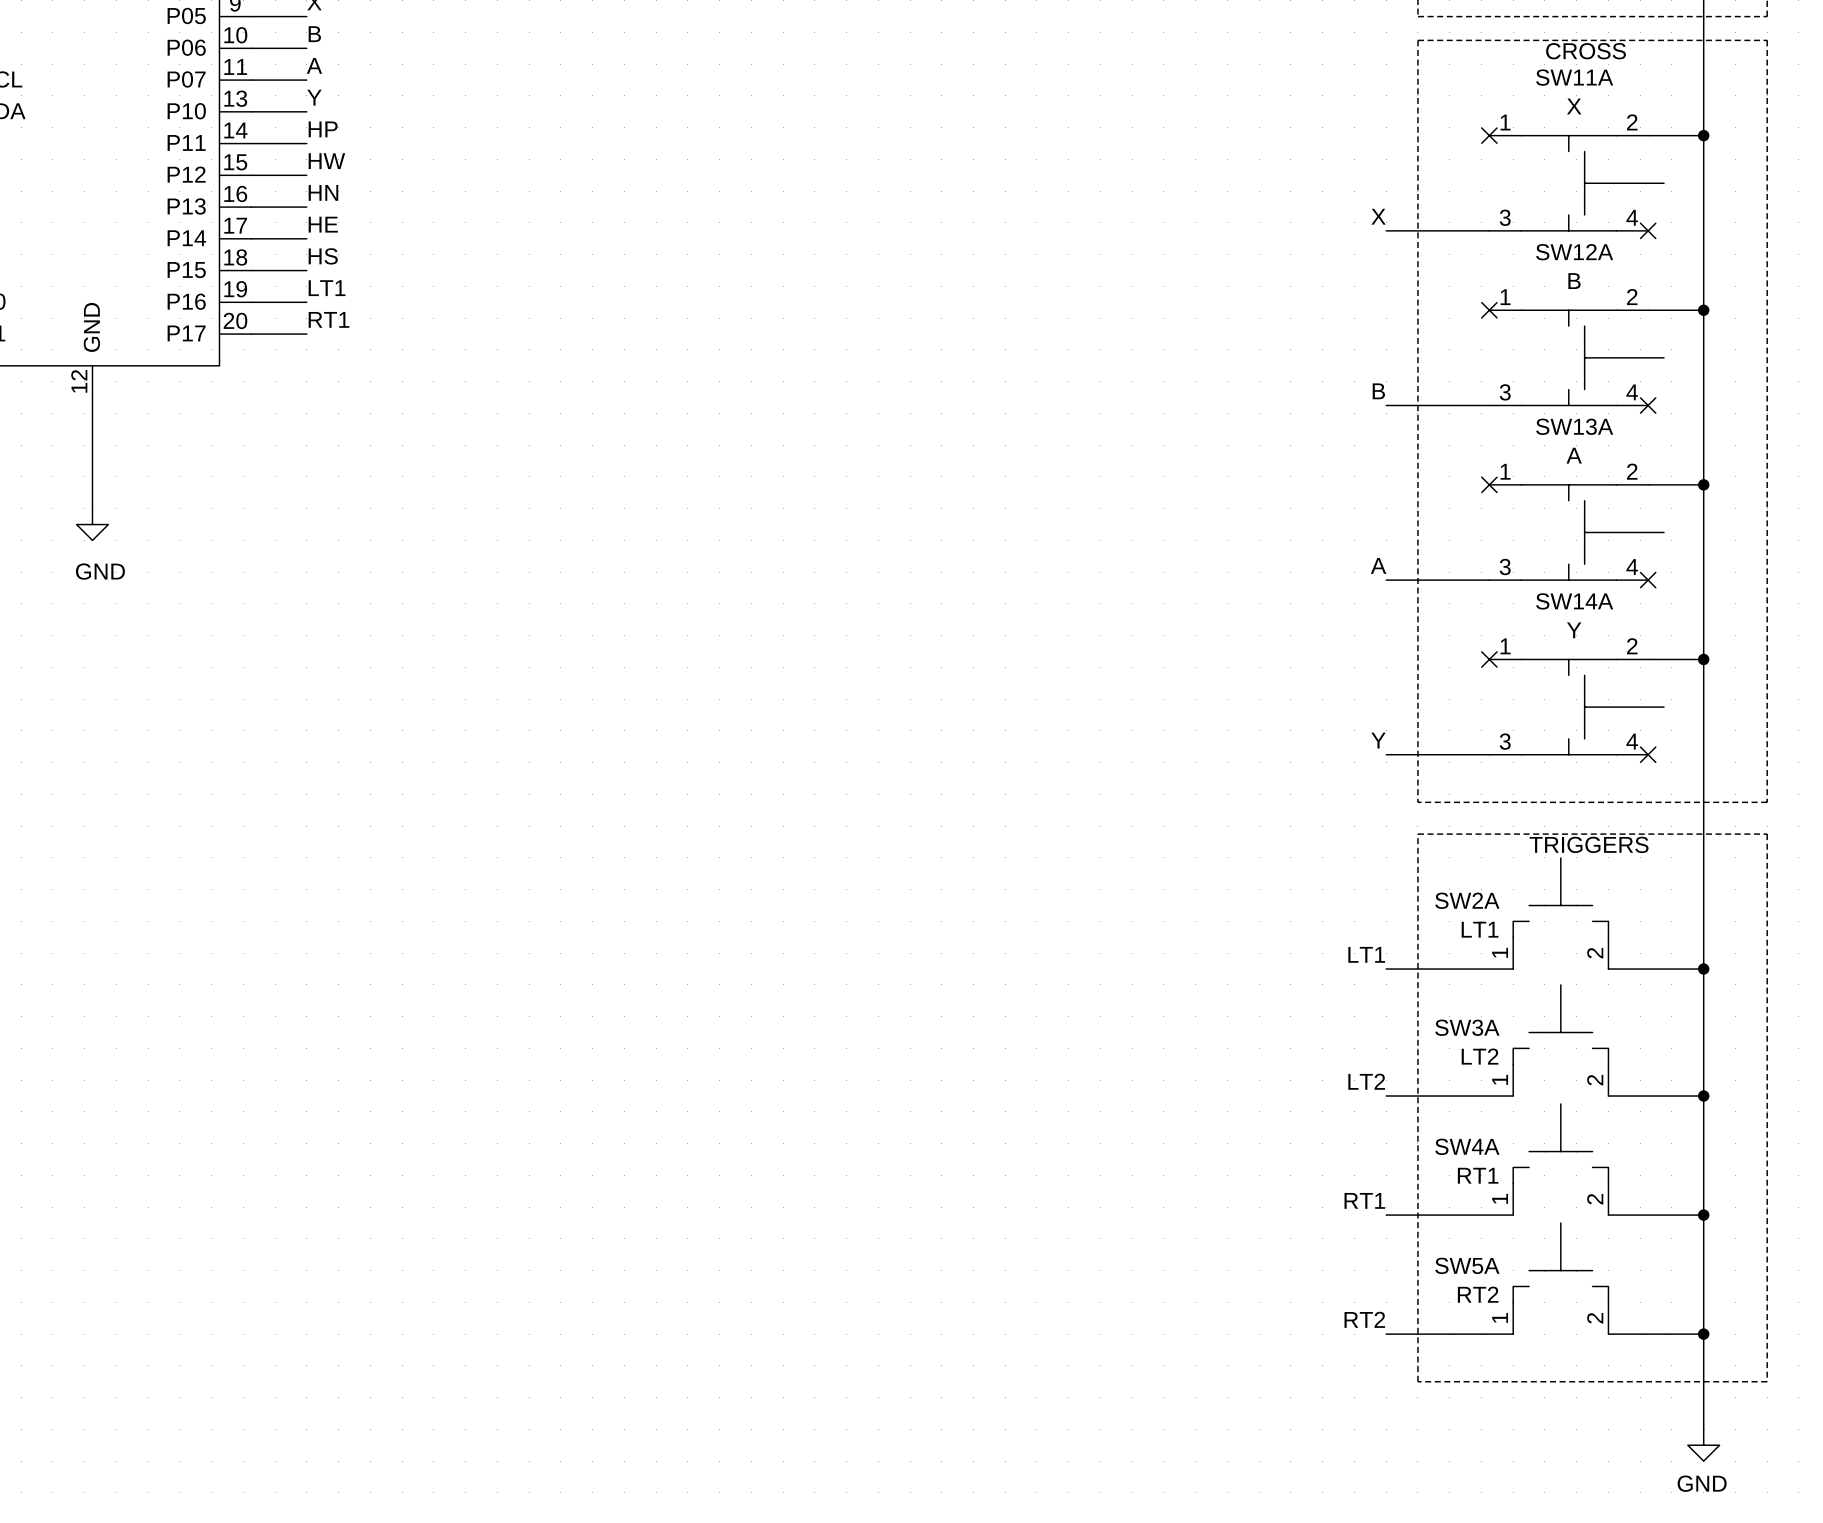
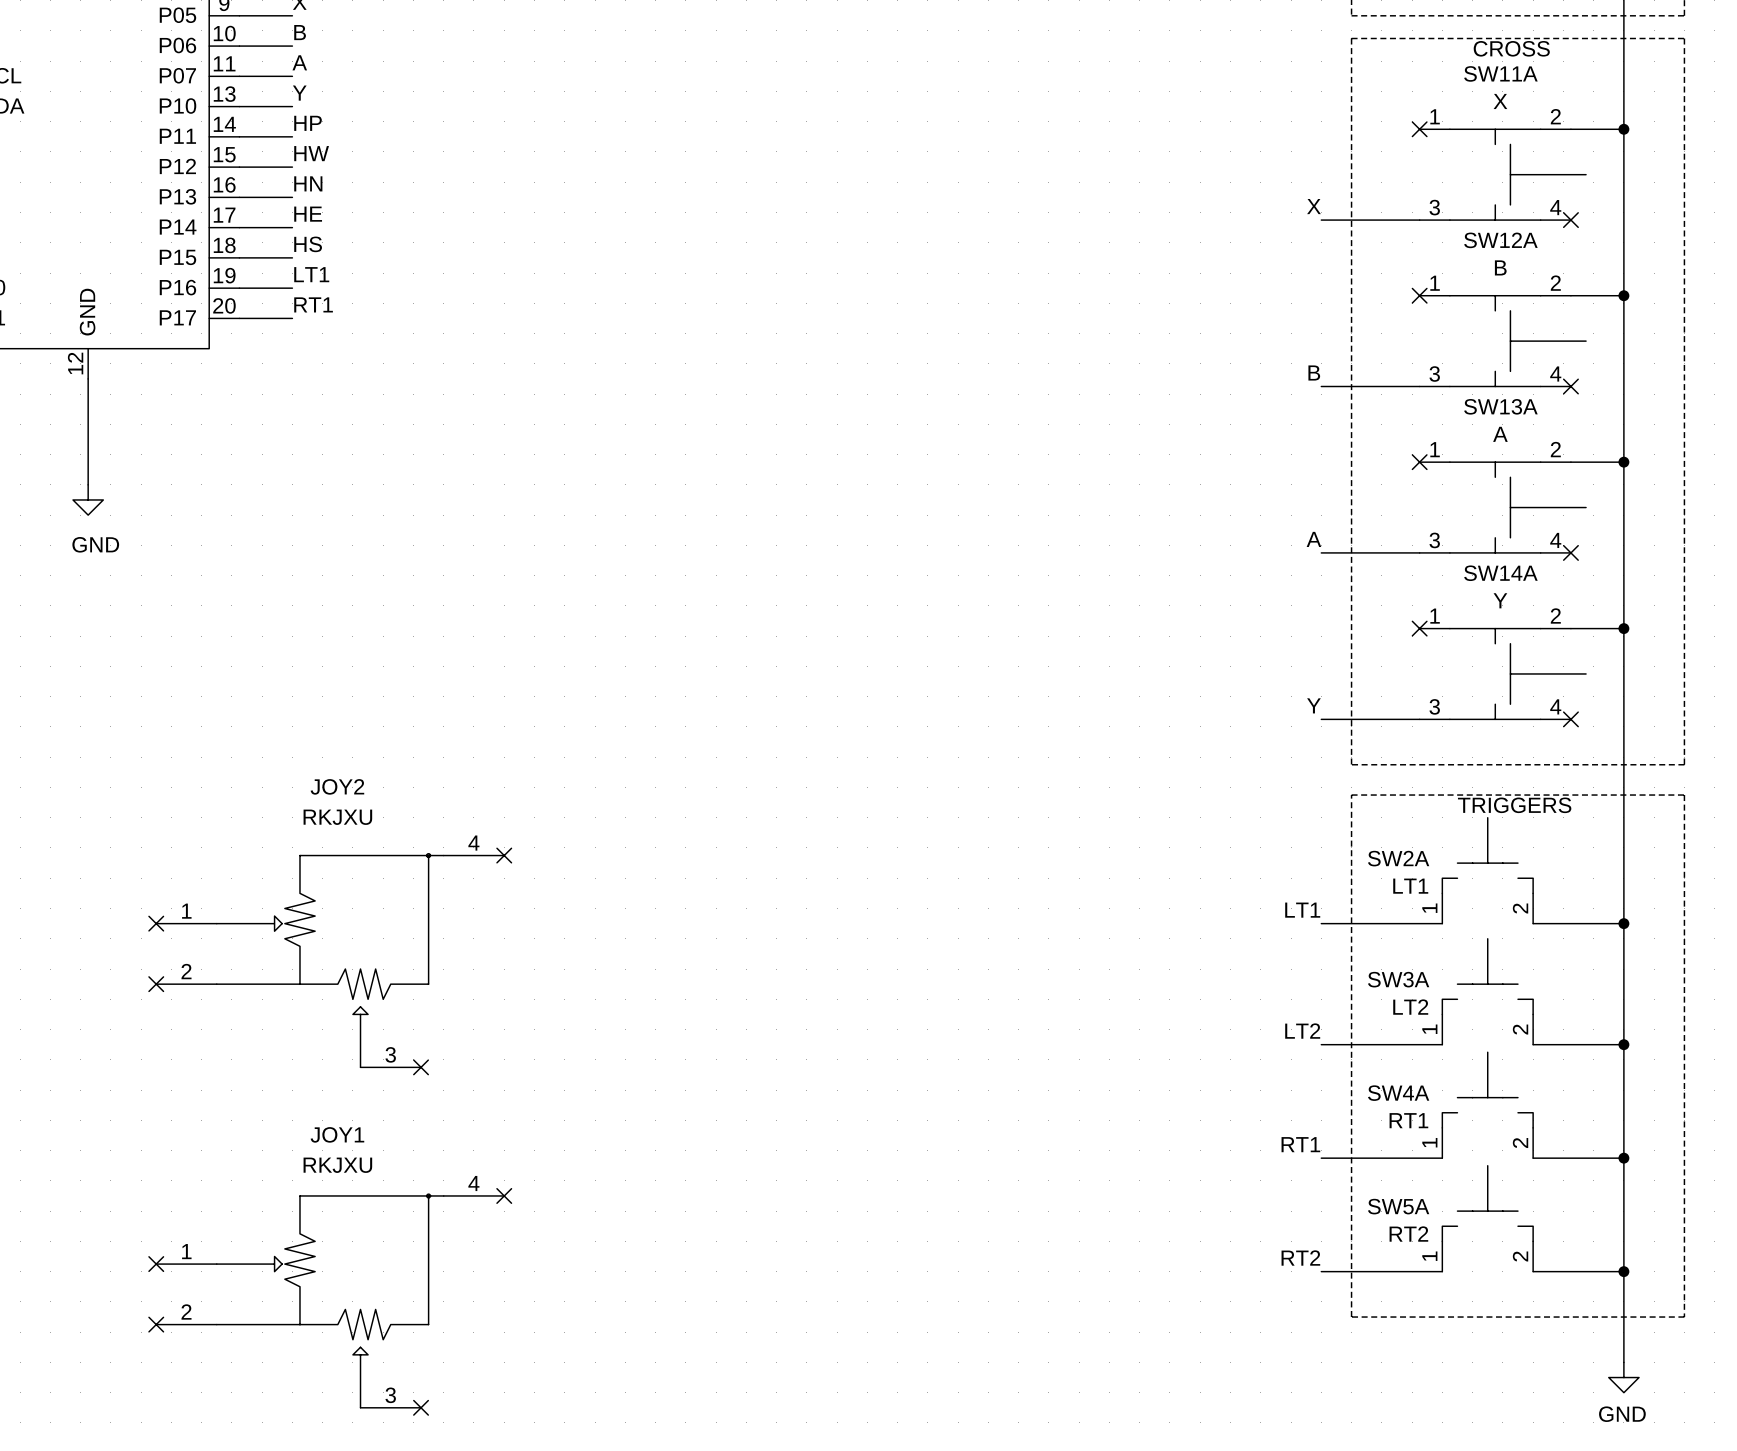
no-connect mark: none -> (504, 855)
no-connect mark: none -> (156, 923)
JOY2: none -> RKJXU (330, 960)
no-connect mark: none -> (156, 984)
no-connect mark: none -> (421, 1067)
no-connect mark: none -> (504, 1195)
no-connect mark: none -> (156, 1264)
JOY1: none -> RKJXU (330, 1300)
no-connect mark: none -> (156, 1324)
no-connect mark: none -> (421, 1407)

